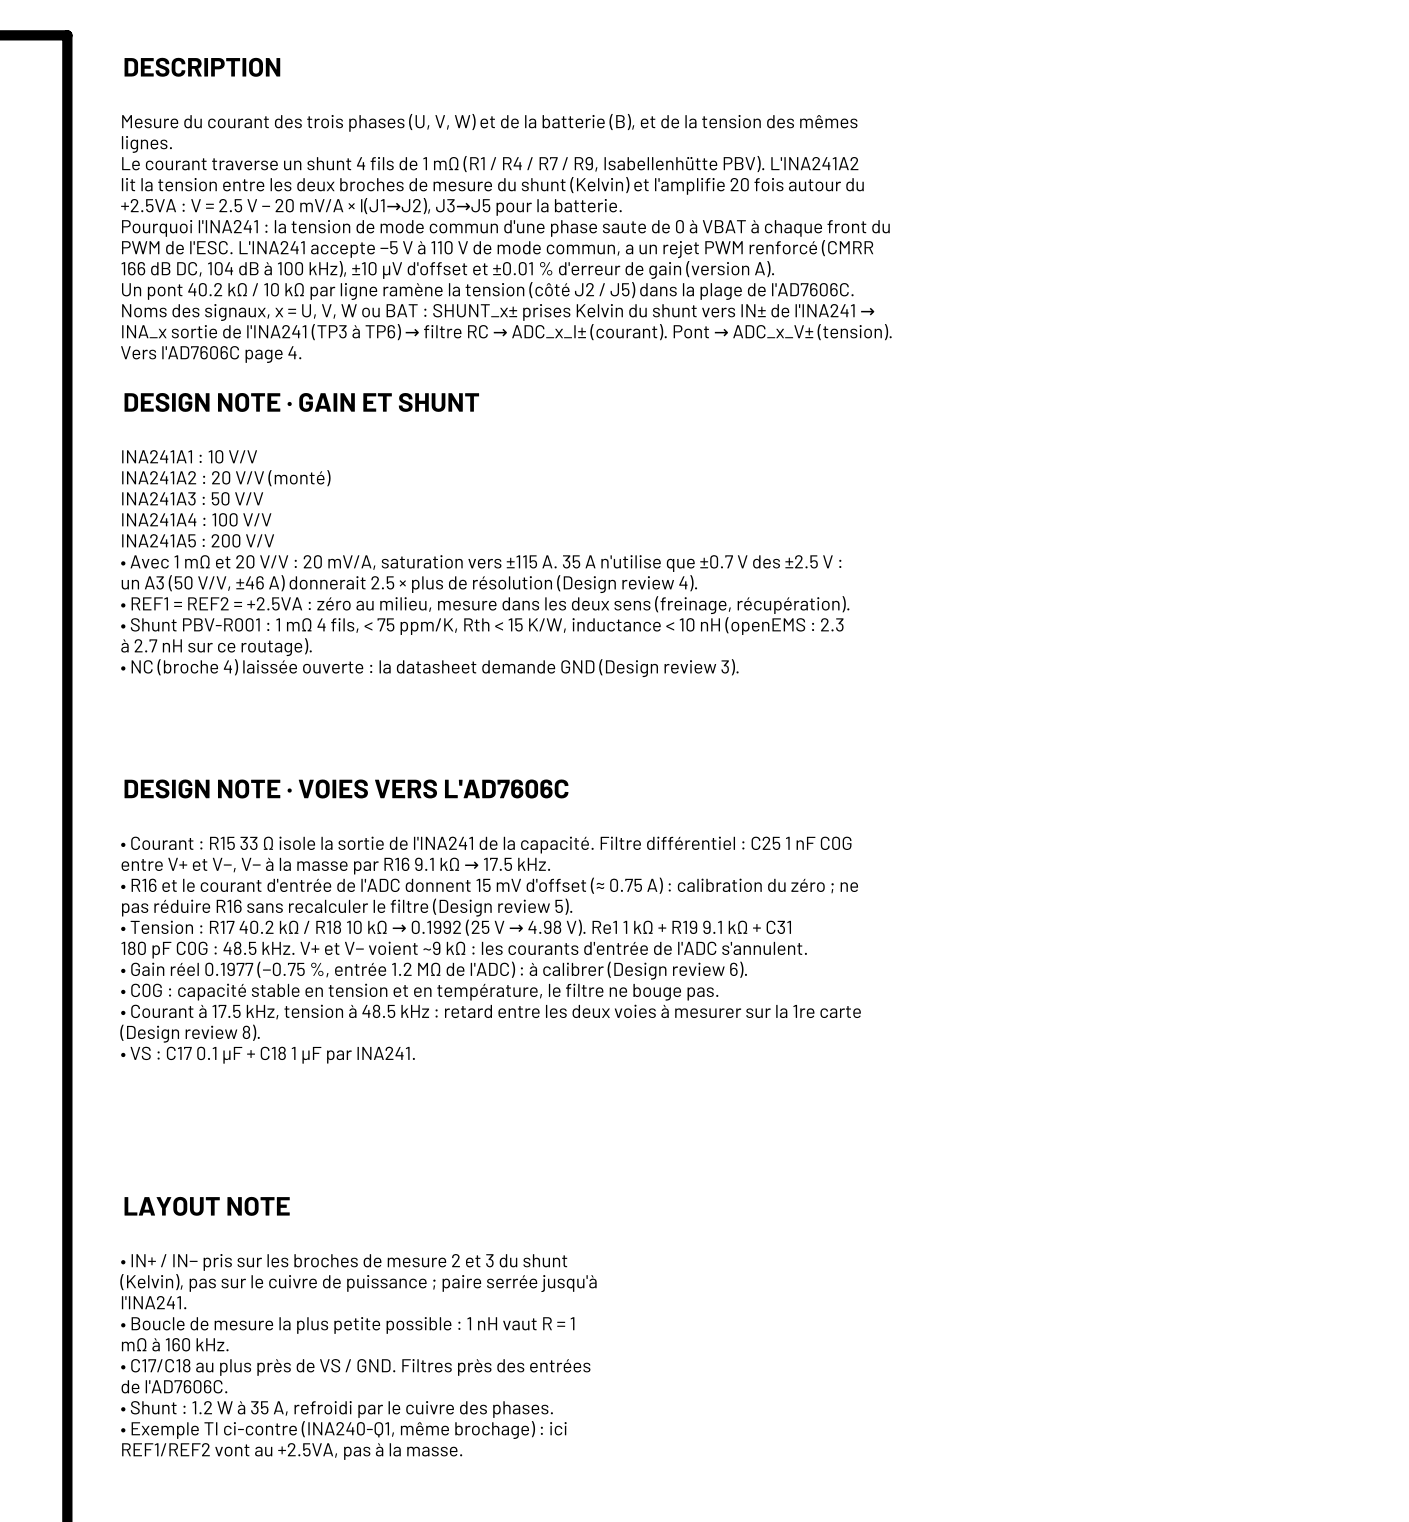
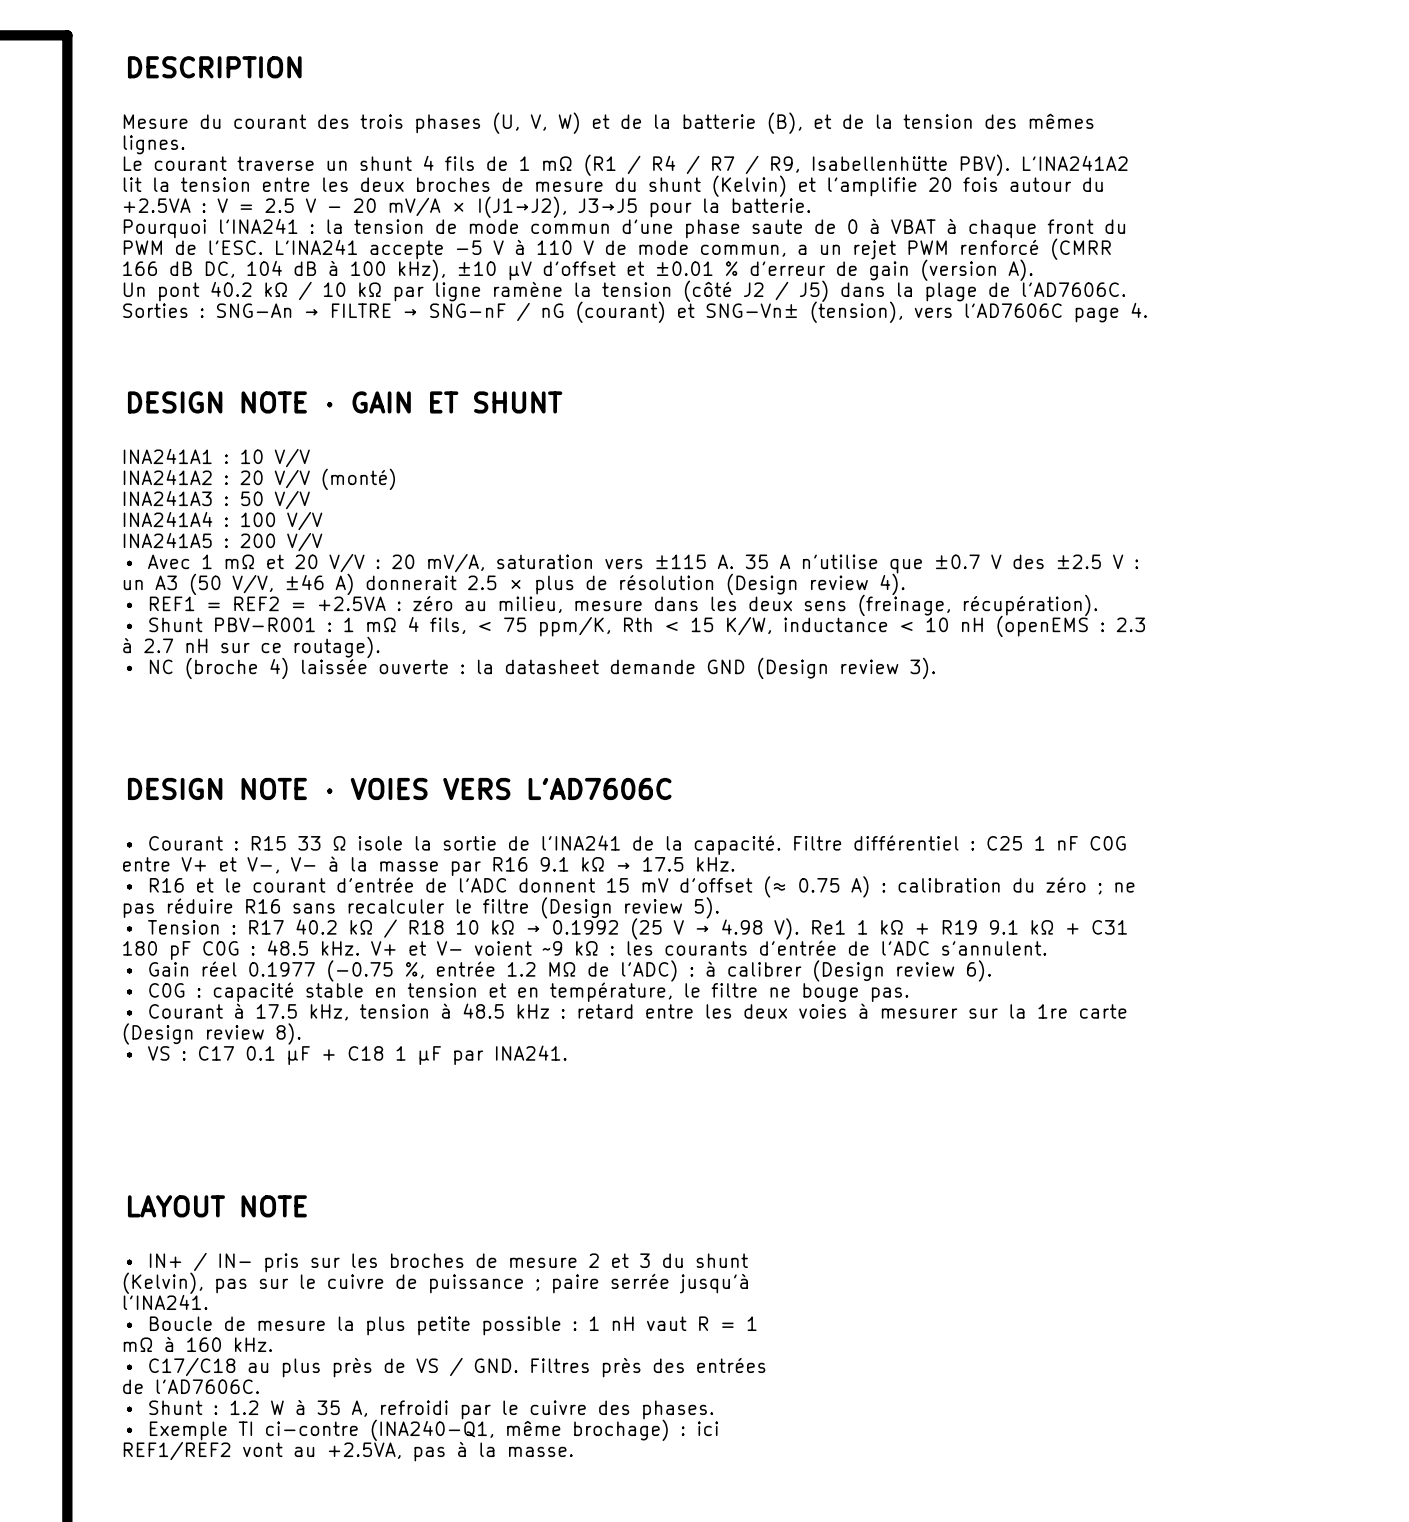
text: Noms des signaux, x = U, V, W ou BAT : SHUNT_x± prises Kelvin du shunt vers IN± de l'INA241 → (498, 312) -> Sorties : SNG-An → FILTRE → SNG-nF / nG (courant) et SNG-Vn± (tension), vers l'AD7606C page 4. (635, 312)
text: INA_x sortie de l'INA241 (TP3 à TP6) → filtre RC → ADC_x_I± (courant). Pont → ADC_x_V± (tension). (506, 332) -> none
text: Vers l'AD7606C page 4. (211, 354) -> none

